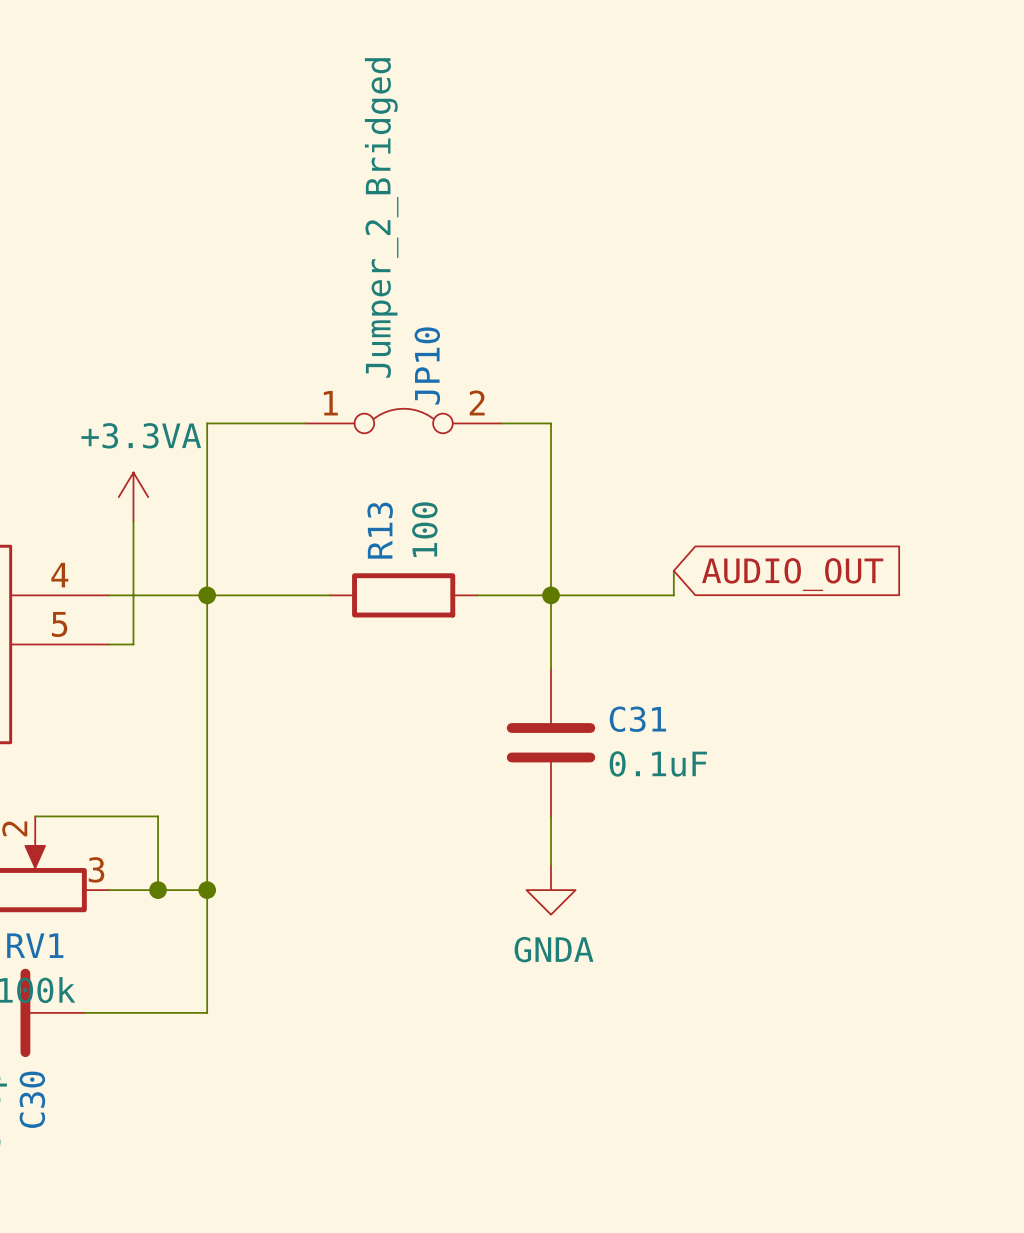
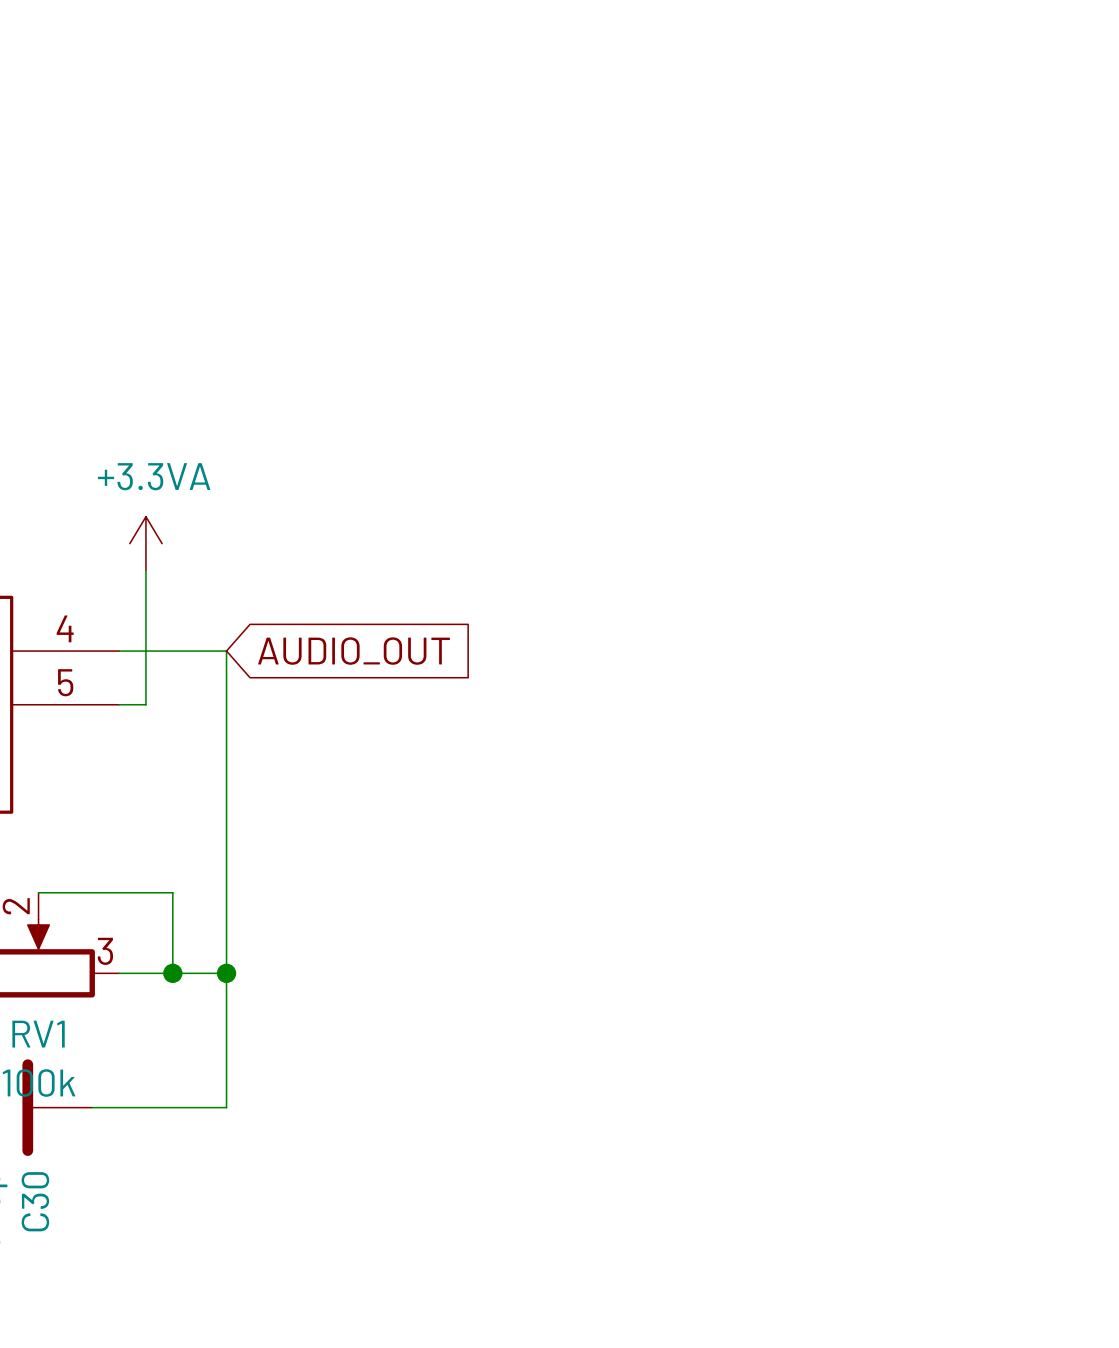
JP10: Jumper_2_Bridged (403, 420) -> none
wire: (305, 423) (207, 423) (207, 595) (329, 595) -> none
wire: (501, 423) (551, 423) (551, 669) -> none
wire: (673, 570) (673, 595) (477, 595) -> none
global label position: AUDIO_OUT (792, 574) -> AUDIO_OUT (353, 651)
junction: (207, 595) -> none
R13: 100 (403, 595) -> none
junction: (551, 595) -> none
C31: 0.1uF (551, 742) -> none
wire: (551, 816) (551, 865) -> none
power symbol: GNDA (551, 890) -> none

